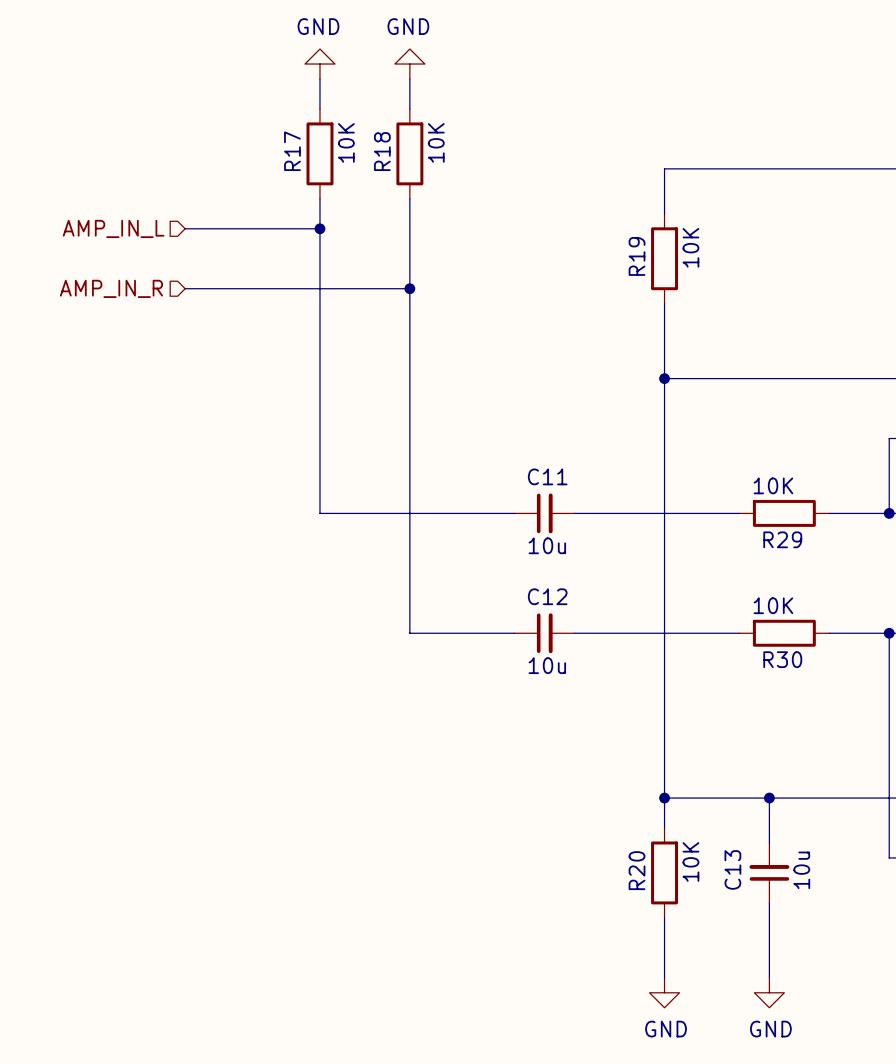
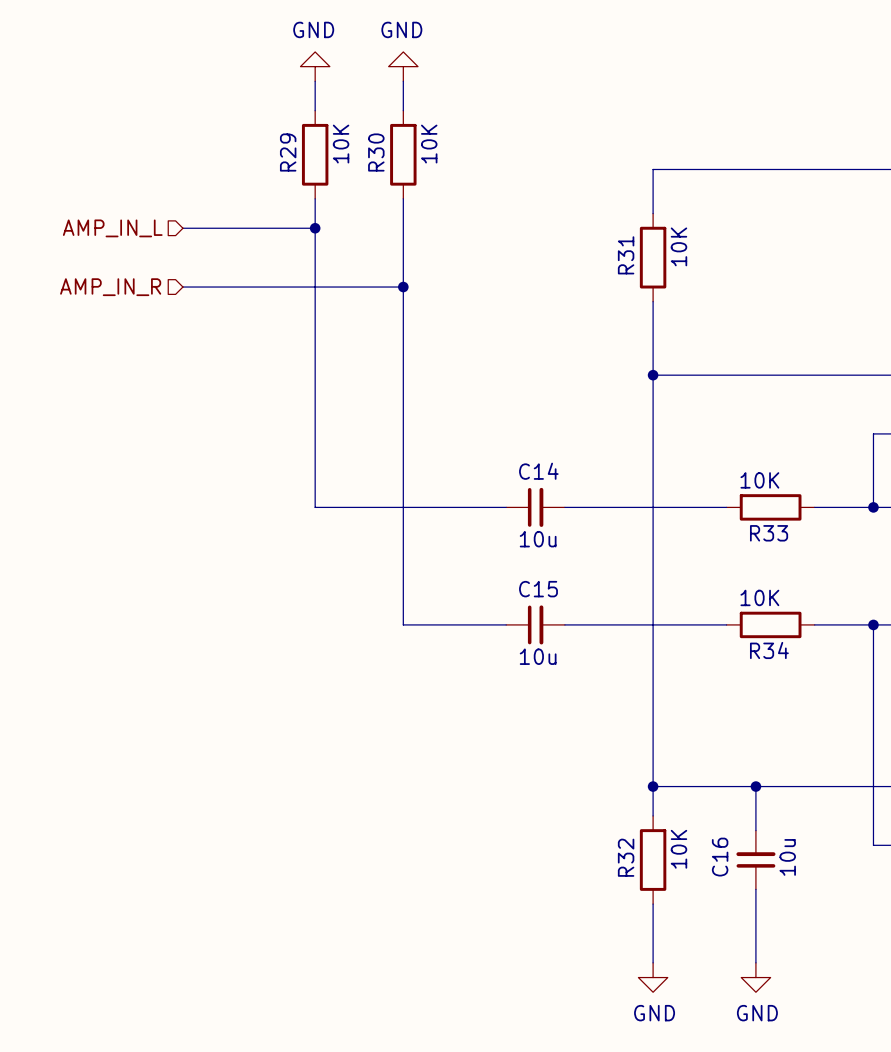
R17 name: R17 (292, 151) -> R29 (288, 152)
R18 name: R18 (382, 151) -> R30 (376, 152)
R19 name: R19 (637, 256) -> R31 (626, 255)
C11 name: C11 (547, 476) -> C14 (538, 471)
R29 name: R29 (782, 539) -> R33 (769, 533)
C12 name: C12 (547, 596) -> C15 (538, 589)
R30 name: R30 (782, 659) -> R34 (769, 650)
C13 name: C13 (732, 869) -> C16 (720, 857)
R20 name: R20 (637, 870) -> R32 (626, 857)

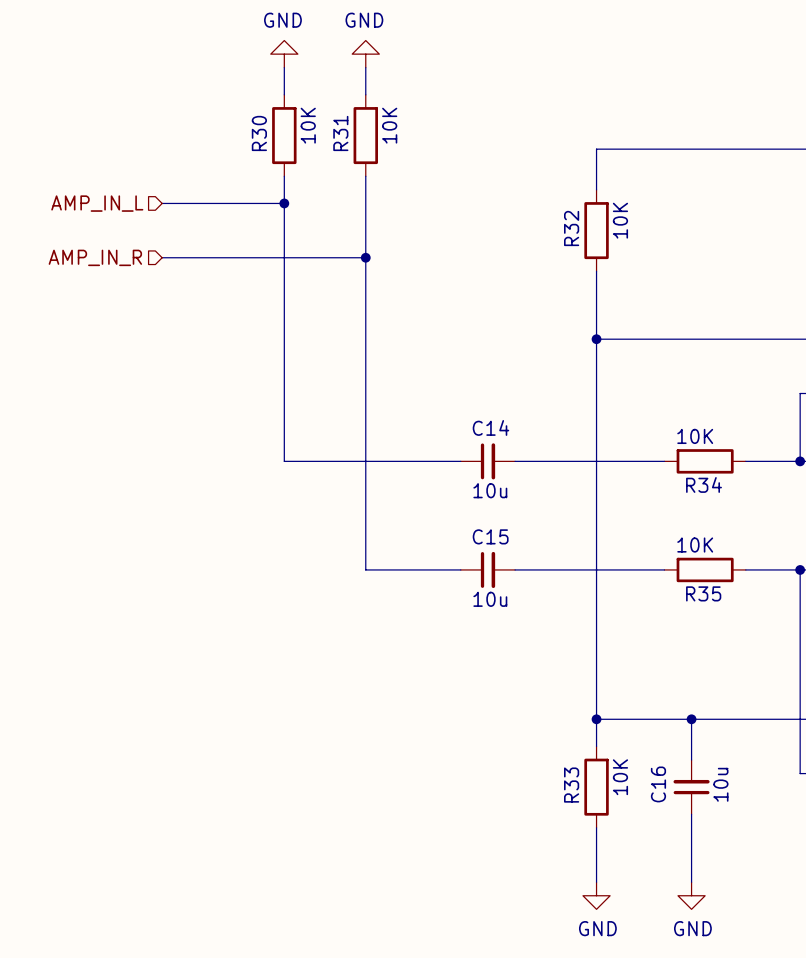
R29 name: R29 (288, 152) -> R30 (259, 133)
R30 name: R30 (376, 152) -> R31 (340, 133)
R31 name: R31 (626, 255) -> R32 (571, 228)
R33 name: R33 (769, 533) -> R34 (704, 484)
R34 name: R34 (769, 650) -> R35 (703, 593)
R32 name: R32 (626, 857) -> R33 (571, 785)

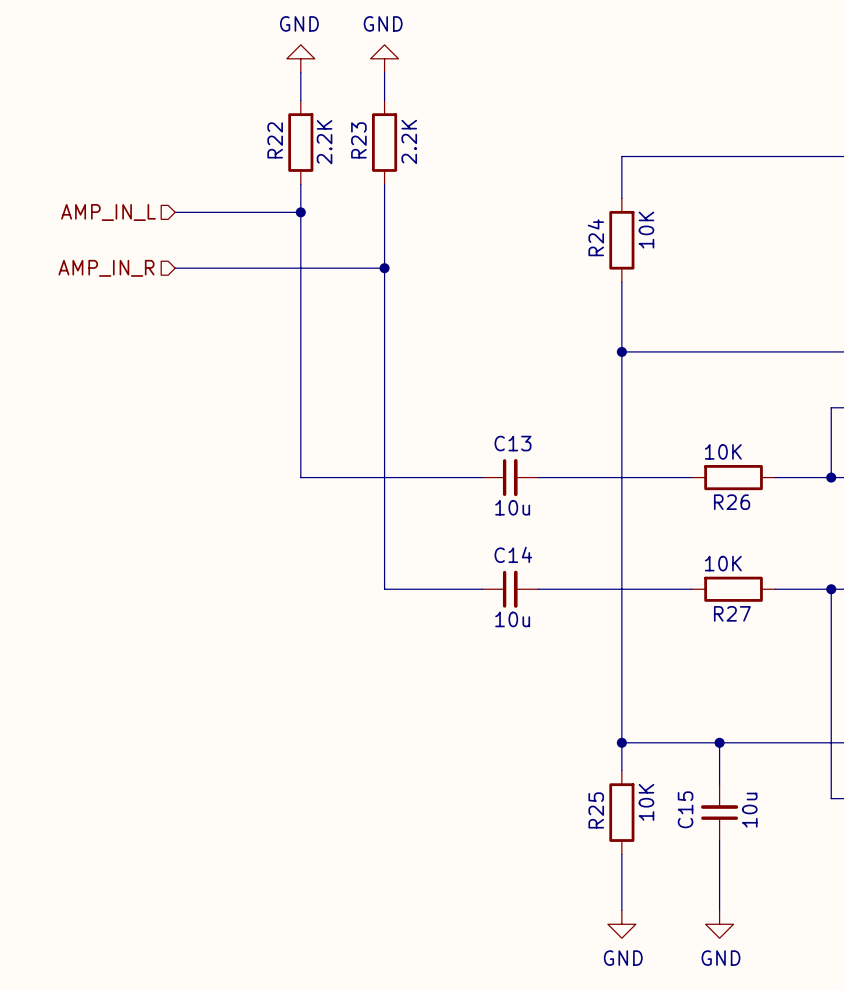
R30 value: 10K (308, 125) -> 2.2K (324, 142)
R31 value: 10K (389, 125) -> 2.2K (409, 141)
R30 name: R30 (259, 133) -> R22 (275, 140)
R31 name: R31 (340, 133) -> R23 (358, 140)
R32 name: R32 (571, 228) -> R24 (595, 237)
C14 name: C14 (490, 427) -> C13 (512, 443)
R34 name: R34 (704, 484) -> R26 (732, 502)
C15 name: C15 (490, 536) -> C14 (513, 554)
R35 name: R35 (703, 593) -> R27 (732, 613)
C16 name: C16 (658, 784) -> C15 (685, 809)
R33 name: R33 (571, 785) -> R25 (596, 810)

